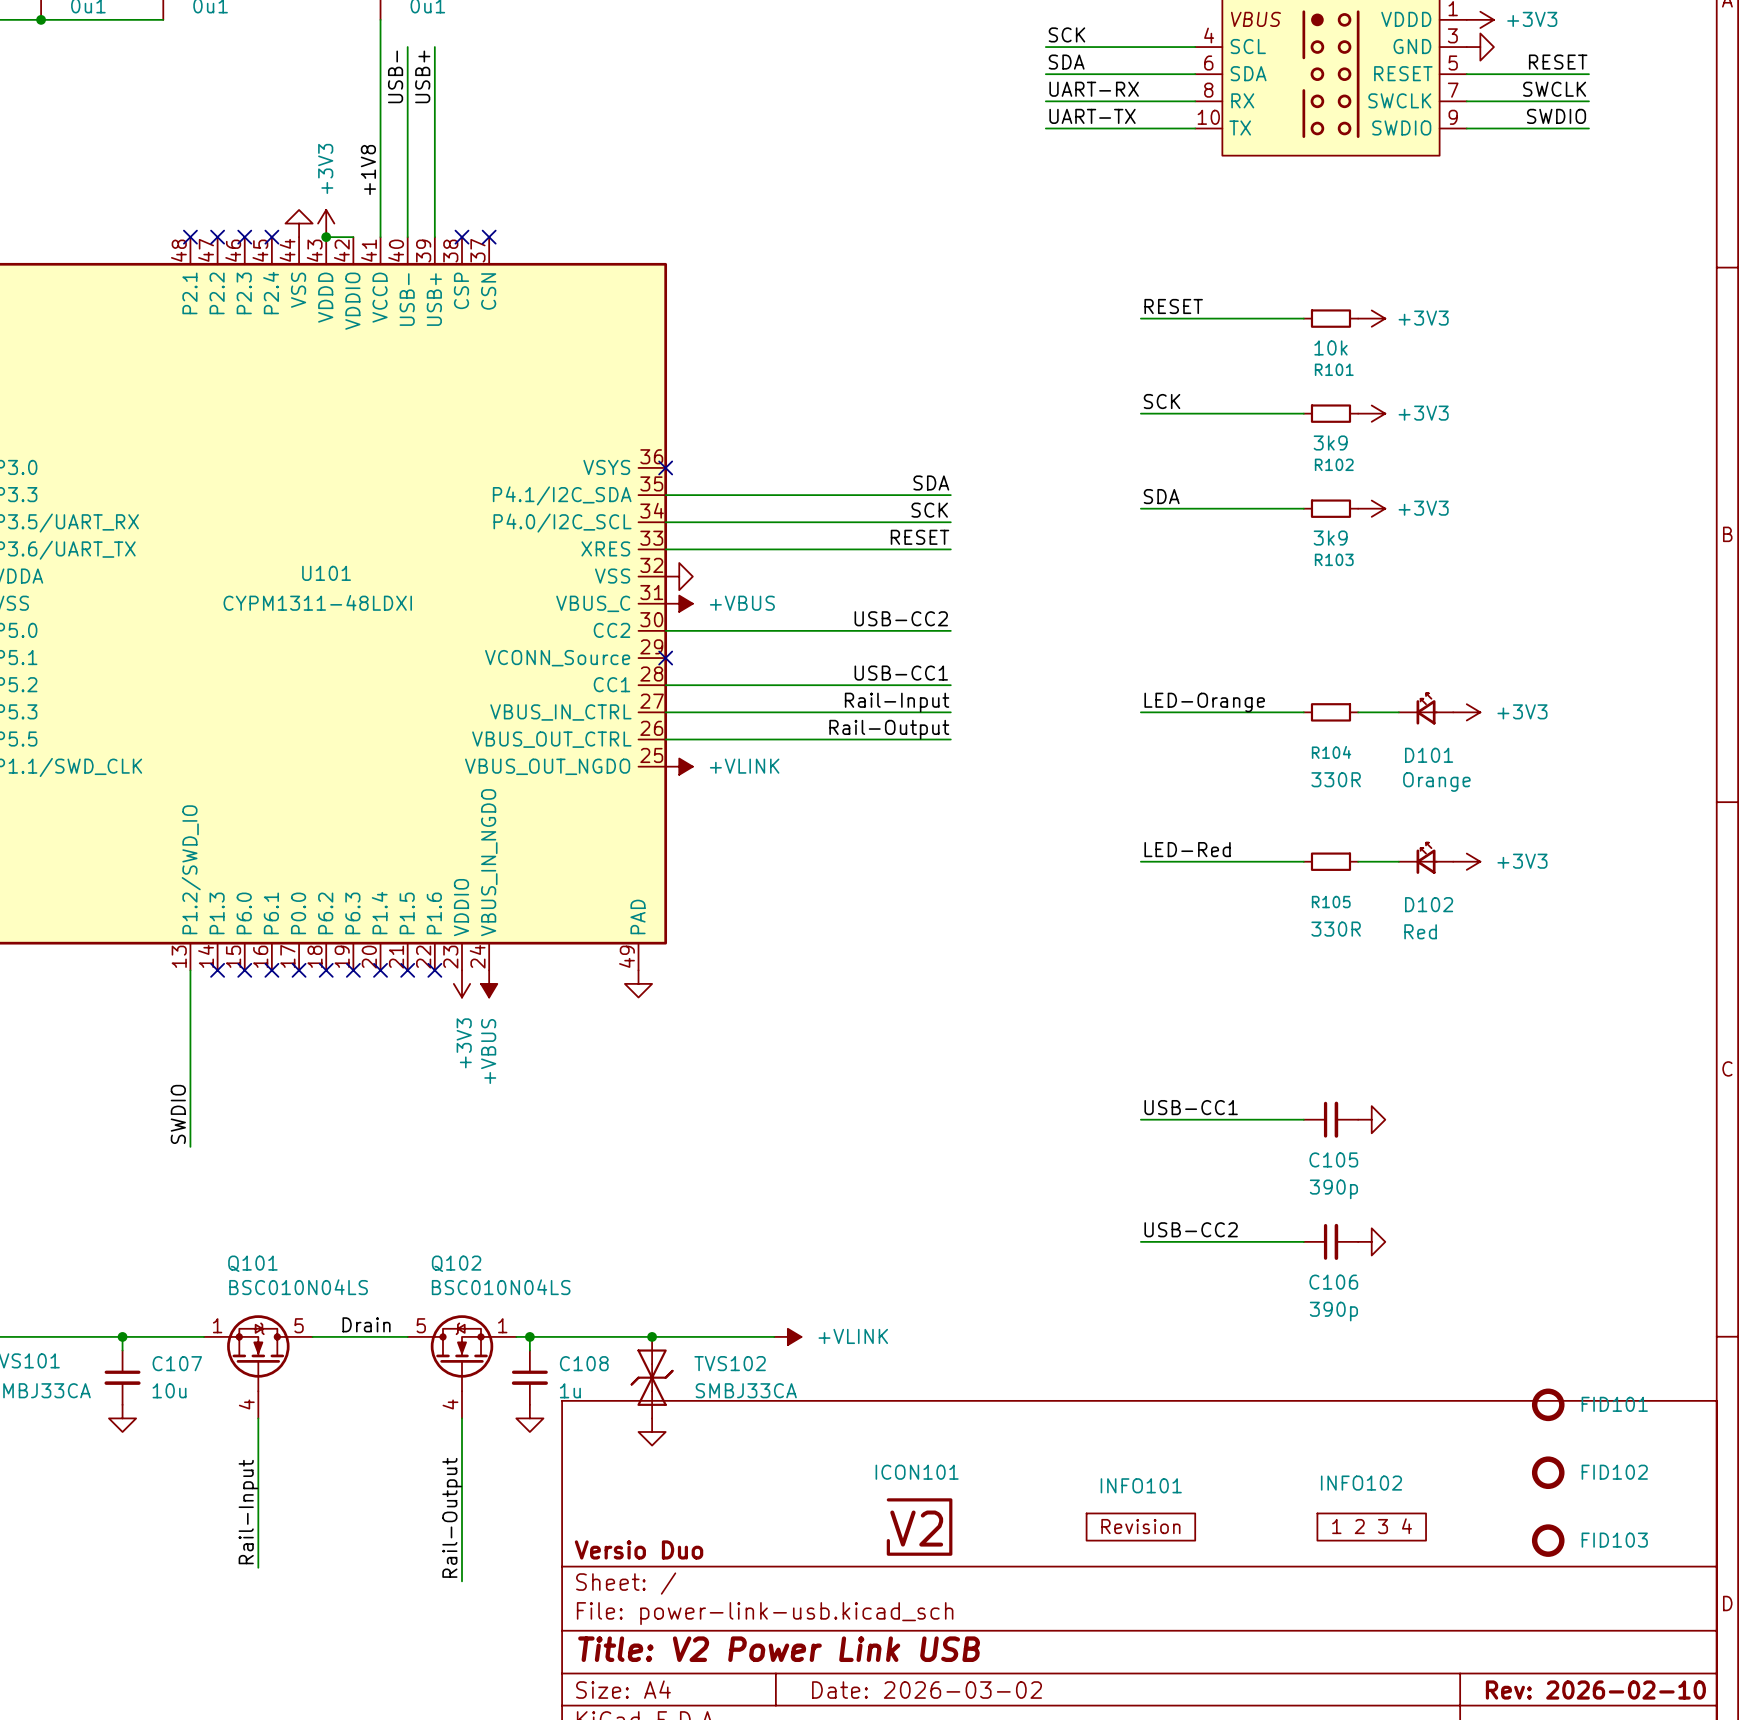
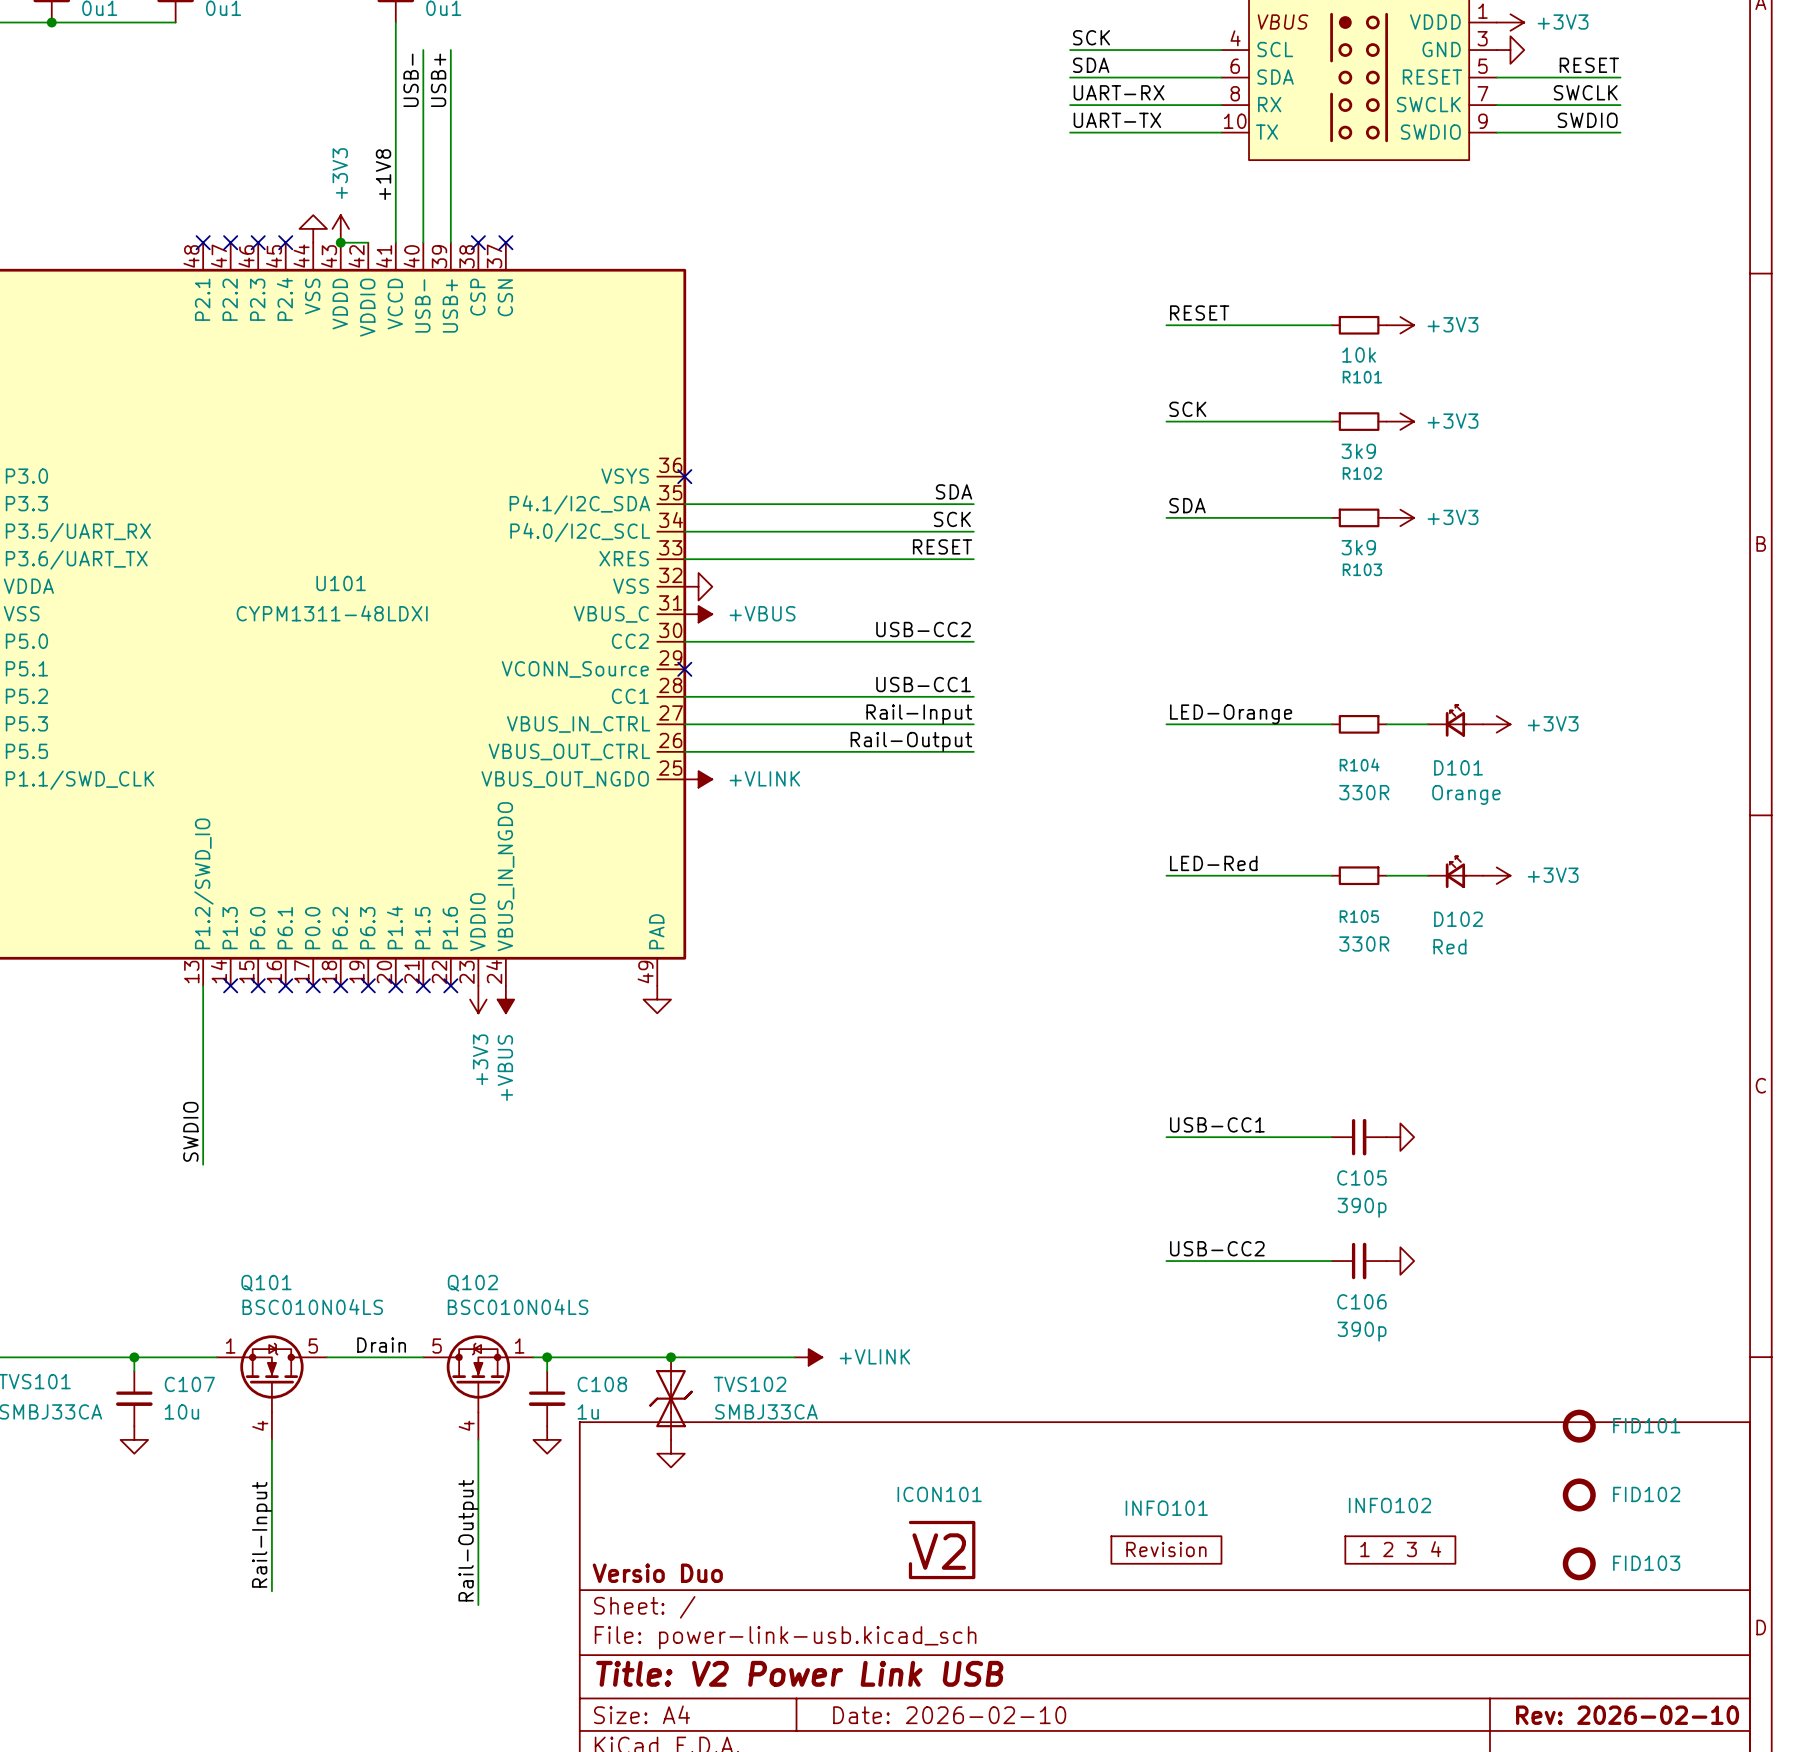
title block: Date: 2026-03-02 (927, 1690) -> Date: 2026-02-10 (949, 1715)

